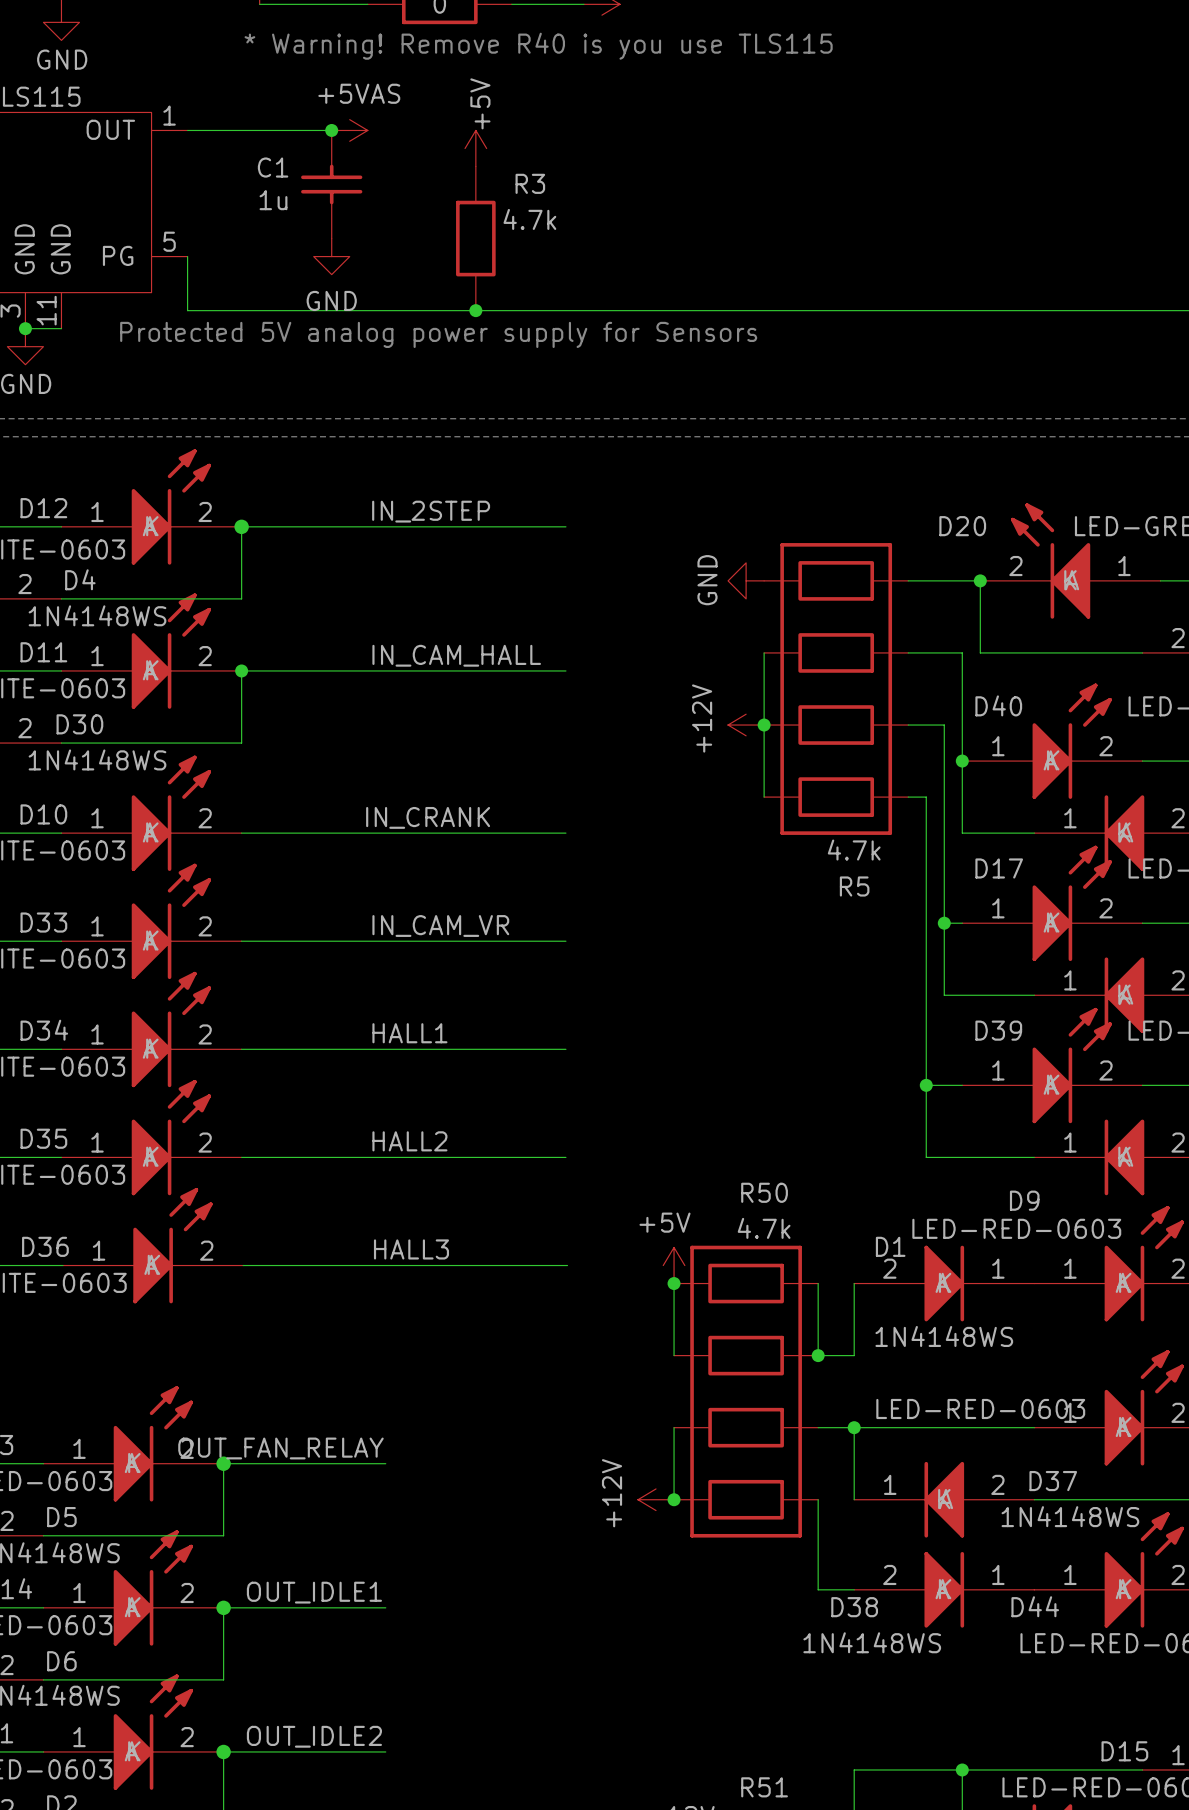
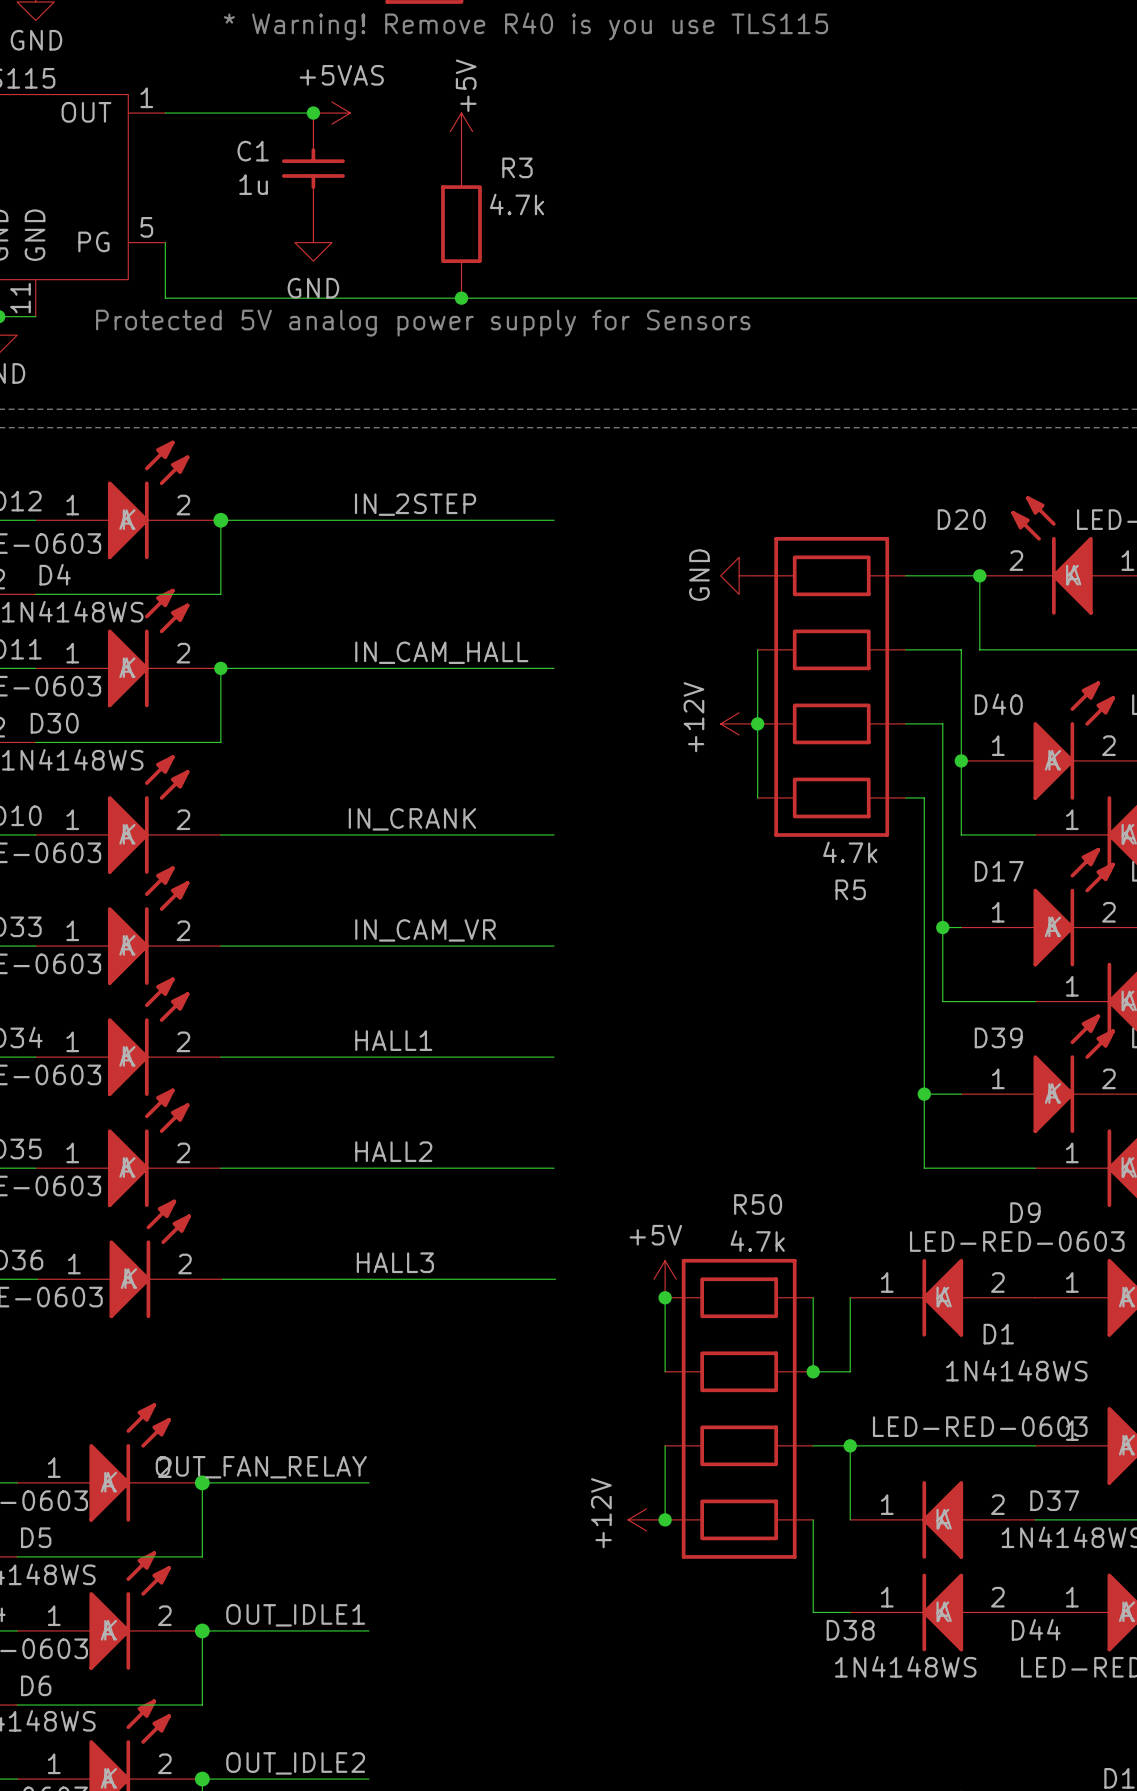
D1 rotation: 0° (944, 1283) -> 180° (942, 1297)
D1 value position: 1N4148WS (944, 1336) -> 1N4148WS (1016, 1370)
D38 rotation: 0° (944, 1589) -> 180° (942, 1612)
D38 value position: 1N4148WS (872, 1642) -> 1N4148WS (905, 1666)

